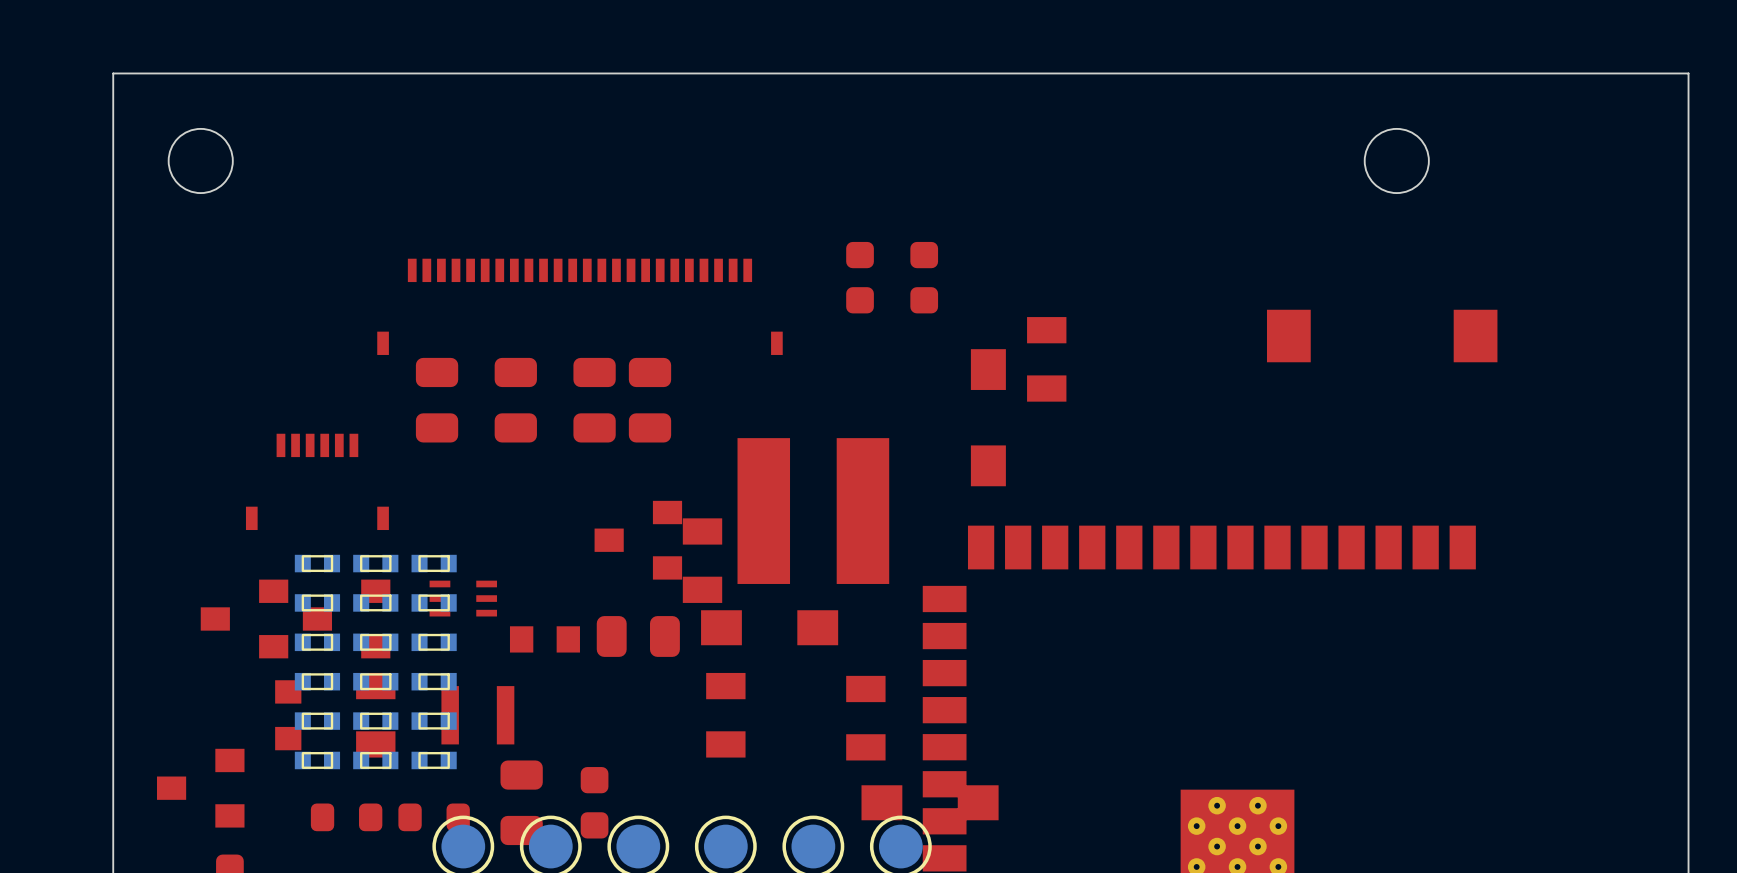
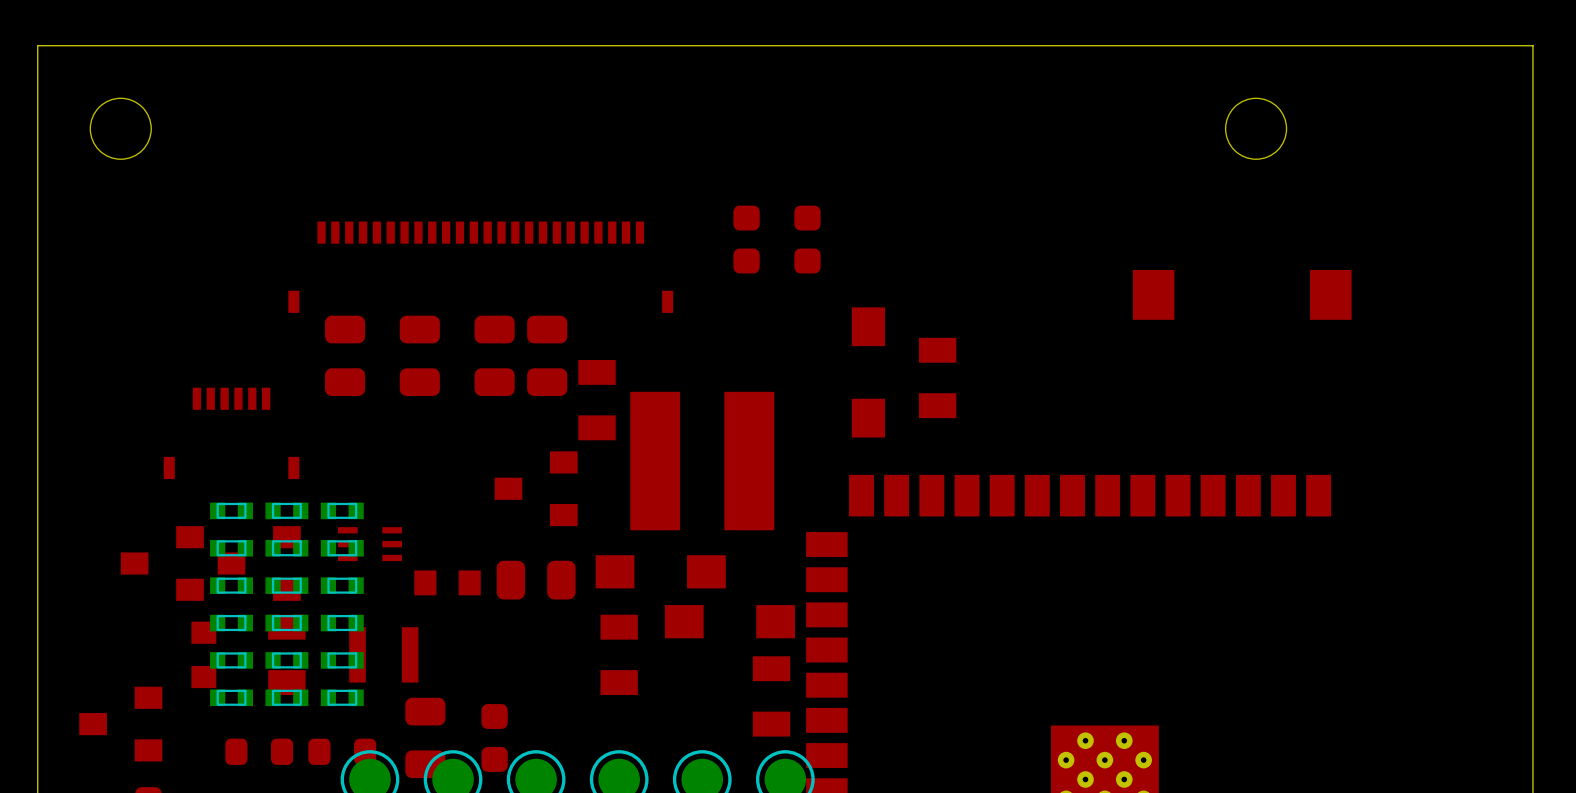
part position: (1046, 359) -> (937, 377)
part position: (702, 560) -> (597, 400)
part position: (865, 718) -> (771, 696)
part position: (930, 802) -> (729, 621)

